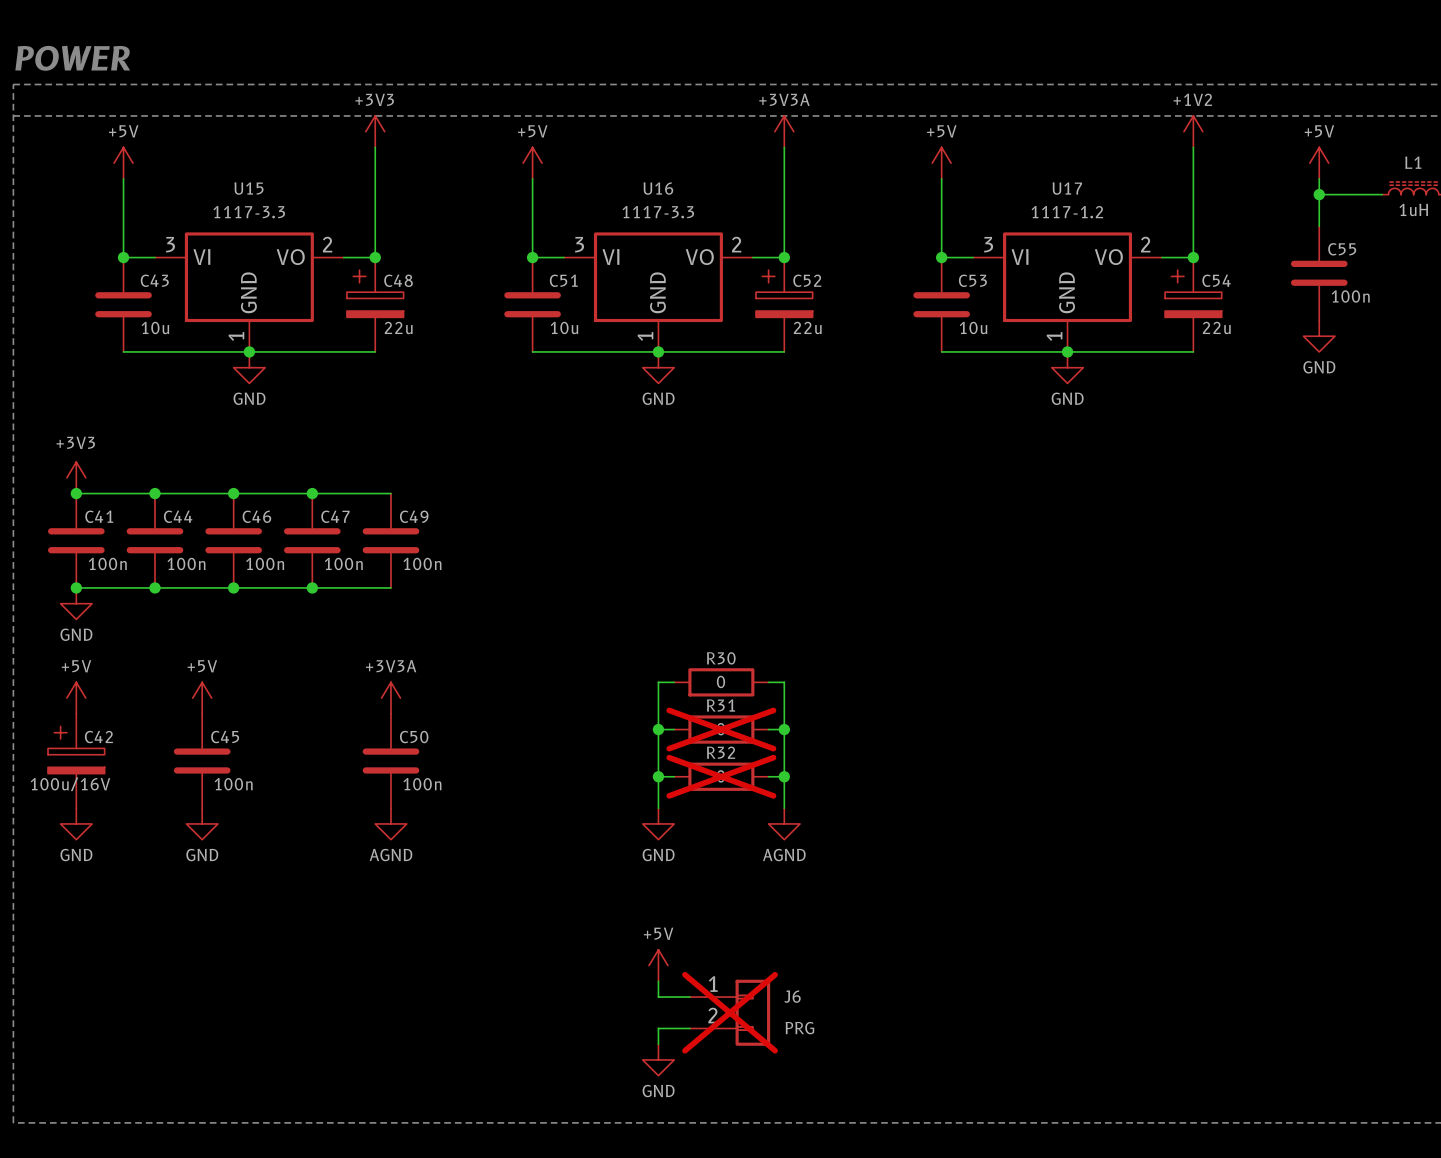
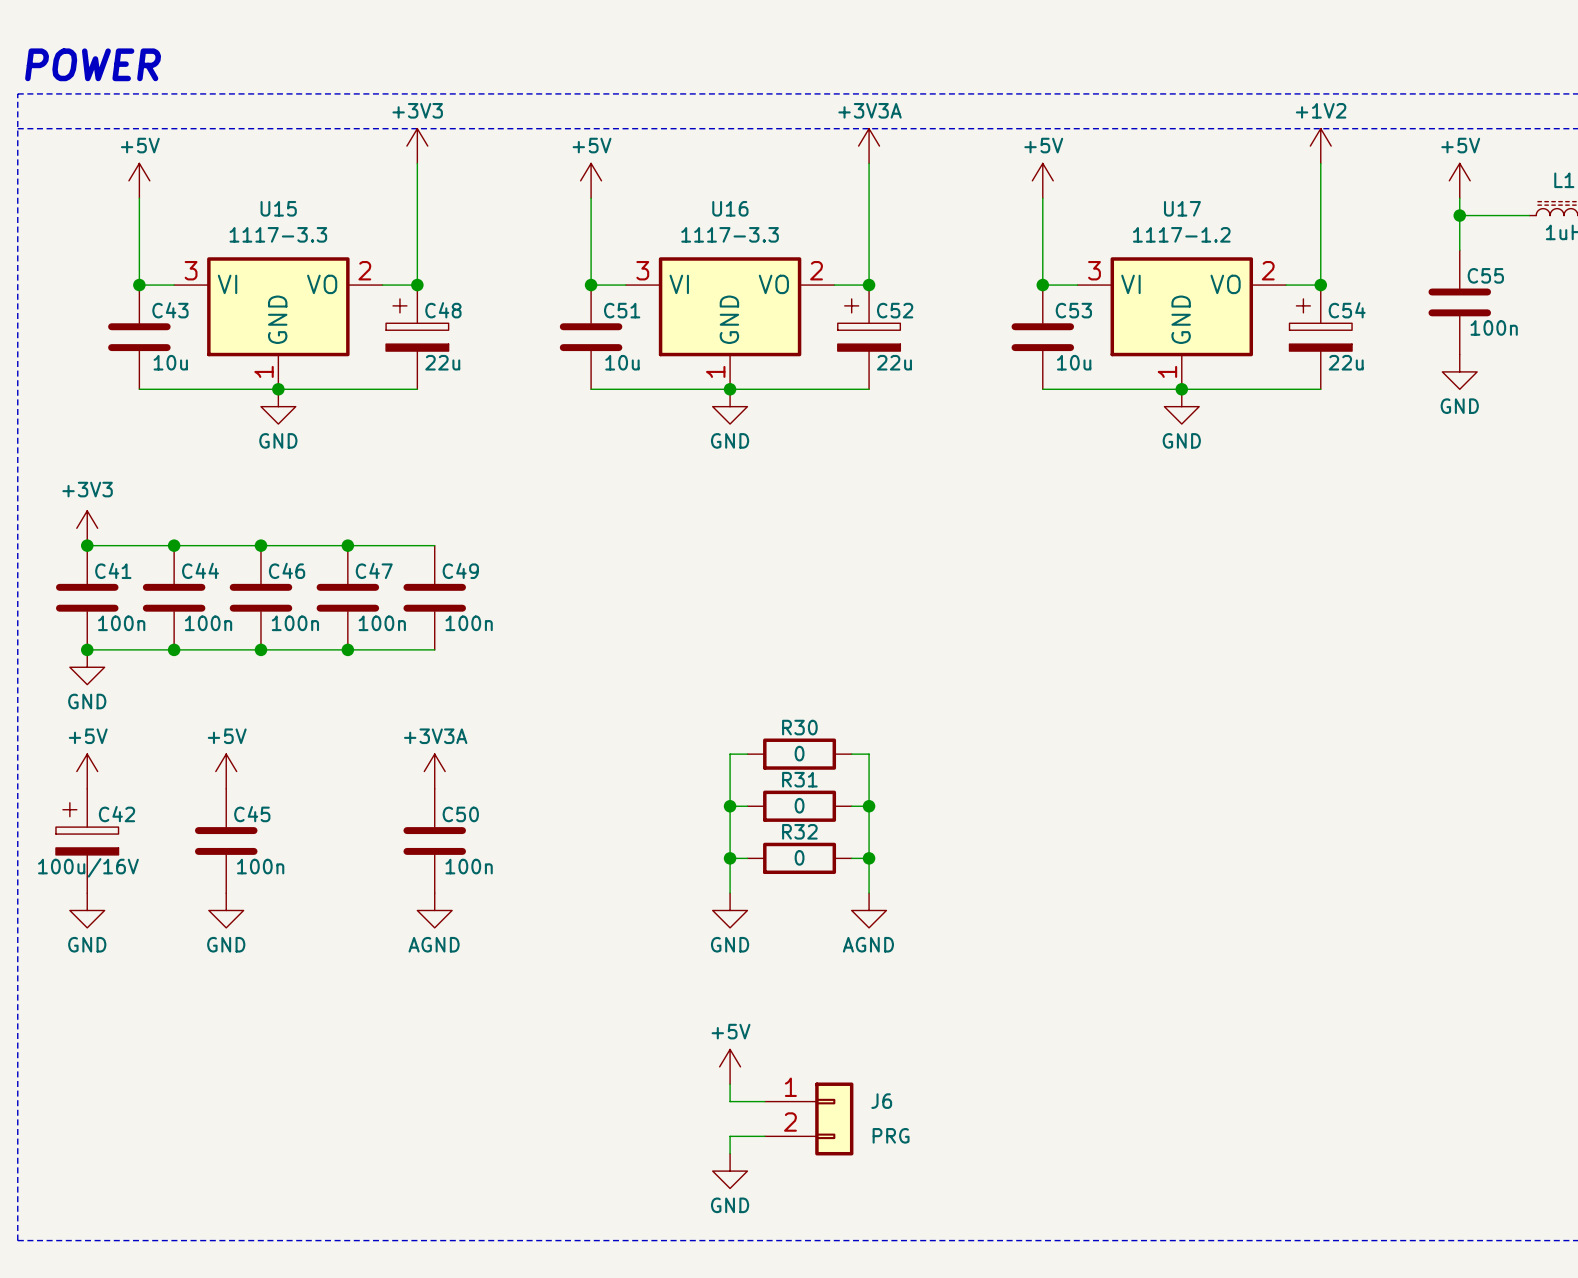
R31 do-not-place cross: (721, 729) -> none
R32 do-not-place cross: (721, 776) -> none
J6 do-not-place cross: (730, 1012) -> none

